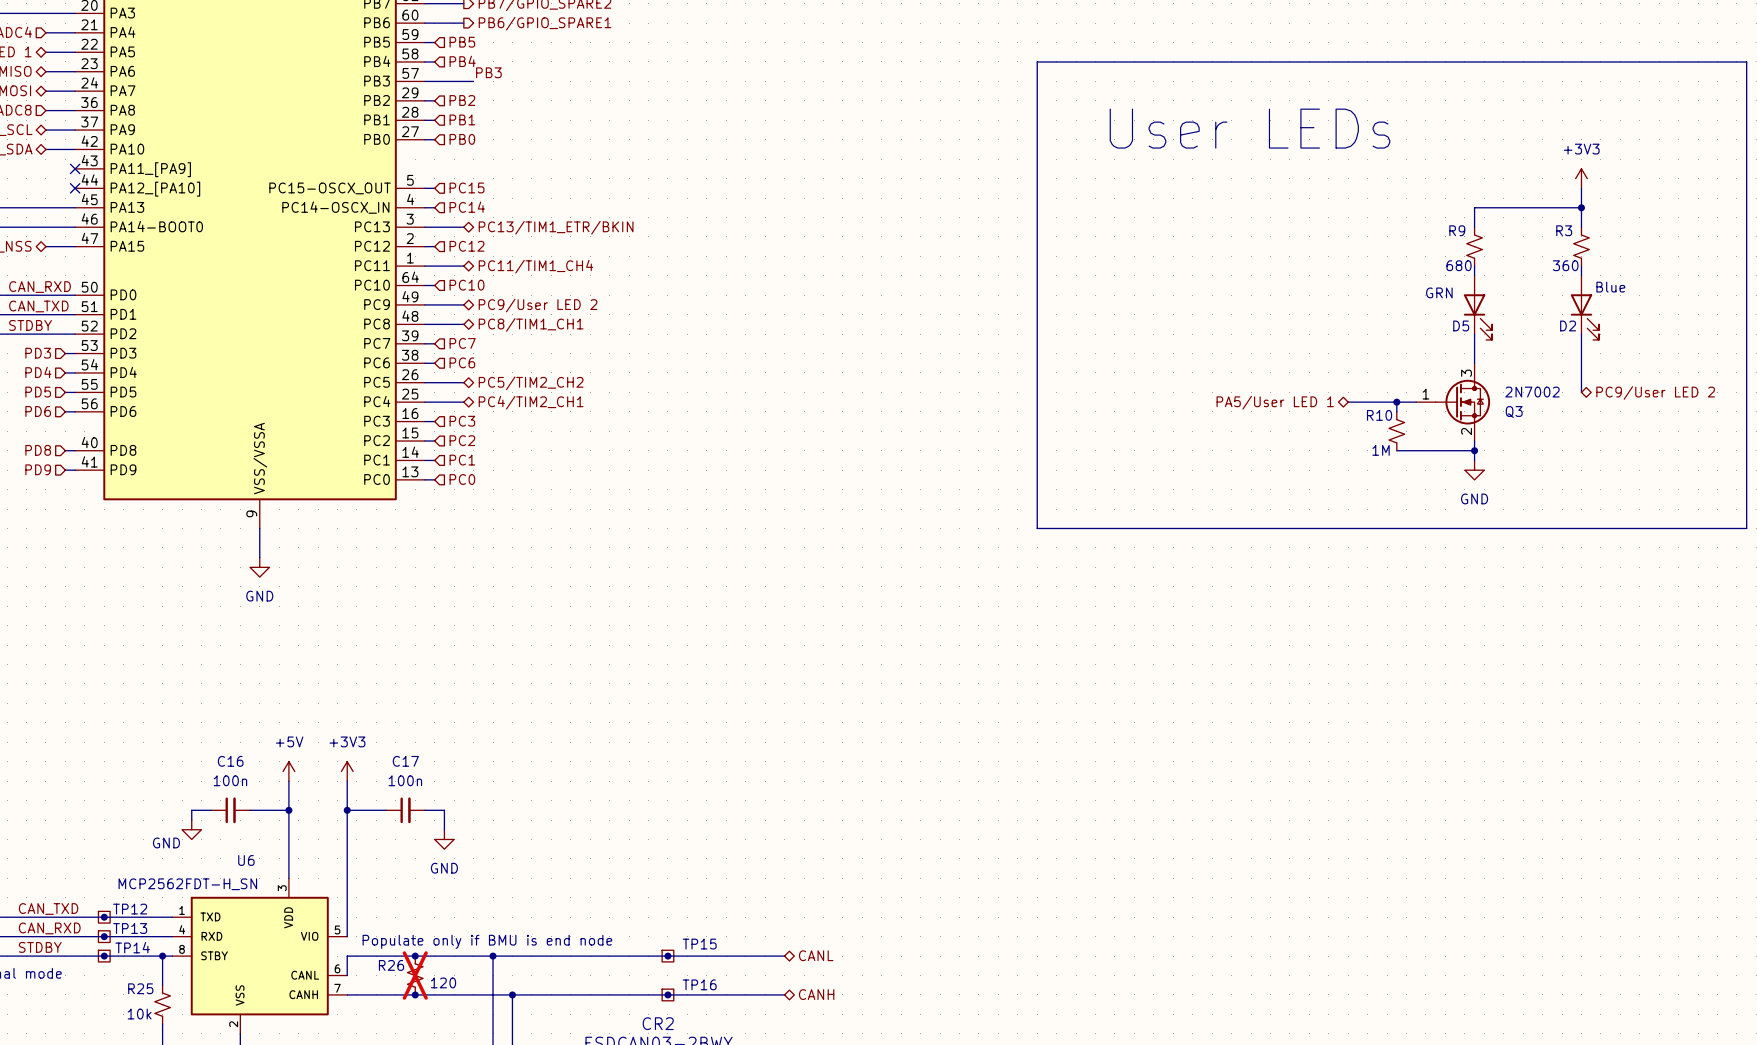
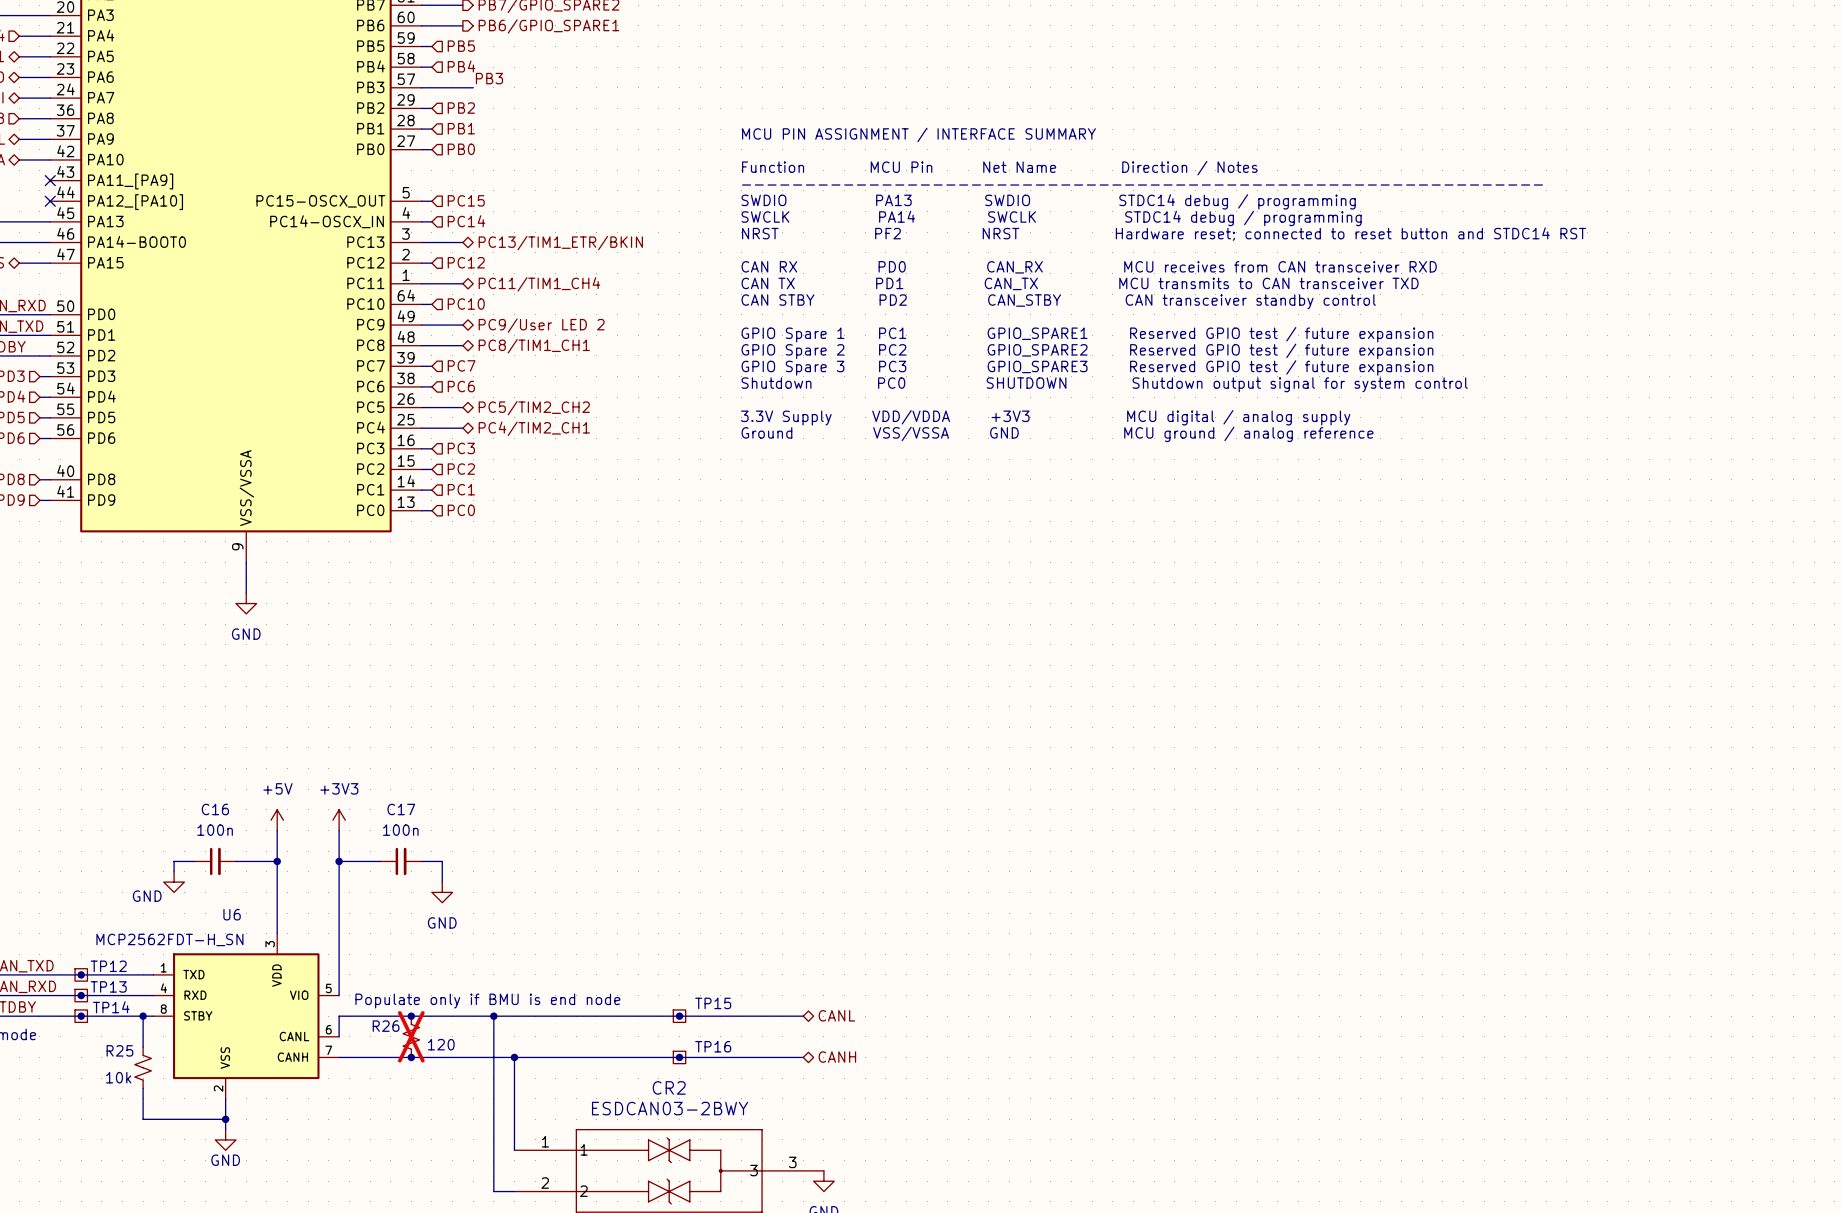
line: (1037, 61) (1746, 61) (1746, 528) (1037, 528) (1037, 61) -> none
text: none -> MCU PIN ASSIGNMENT / INTERFACE SUMMARY (918, 134)
text: User LEDs (1250, 128) -> none
text: none -> Function MCU Pin Net Name Direction / Notes (999, 168)
text: none -> --------------------------------------------------------------- (1142, 185)
power symbol: +3V3 (1581, 178) -> none
text: none -> SWDIO PA13 SWDIO STDC14 debug / programming (1048, 201)
wire: (1581, 188) (1581, 227) -> none
text: none -> SWCLK PA14 SWCLK STDC14 debug / programming (1051, 218)
wire: (1581, 207) (1474, 207) (1474, 227) -> none
junction: (1581, 207) -> none
text: none -> NRST PF2 NRST Hardware reset; connected to reset button and STDC14 RST (1164, 234)
R9: 680 (1474, 246) -> none
R3: 360 (1581, 246) -> none
text: none -> CAN RX PD0 CAN_RX MCU receives from CAN transceiver RXD (1089, 267)
text: none -> CAN TX PD1 CAN_TX MCU transmits to CAN transceiver TXD (1080, 283)
wire: (1474, 266) (1474, 275) -> none
wire: (1581, 266) (1581, 275) -> none
text: none -> CAN STBY PD2 CAN_STBY CAN transceiver standby control (1058, 301)
D5: GRN (1477, 307) -> none
D2: Blue (1584, 307) -> none
text: none -> GPIO Spare 1 PC1 GPIO_SPARE1 Reserved GPIO test / future expansion (1087, 334)
text: none -> GPIO Spare 2 PC2 GPIO_SPARE2 Reserved GPIO test / future expansion (1087, 351)
wire: (1474, 334) (1474, 363) -> none
wire: (1581, 334) (1581, 392) -> none
text: none -> GPIO Spare 3 PC3 GPIO_SPARE3 Reserved GPIO test / future expansion (1087, 367)
text: none -> Shutdown PC0 SHUTDOWN Shutdown output signal for system control (1104, 384)
text: none -> 3.3V Supply VDD/VDDA +3V3 MCU digital / analog supply (1045, 417)
hierarchical label: PC9/User LED 2 (1655, 392) -> none
hierarchical label: PA5/User LED 1 (1275, 402) -> none
wire: (1348, 402) (1416, 402) -> none
wire: (1396, 402) (1396, 411) -> none
junction: (1396, 402) -> none
Q3: 2N7002 (1453, 402) -> none
text: none -> Ground VSS/VSSA GND MCU ground / analog reference (1057, 434)
R10: 1M (1396, 431) -> none
wire: (1474, 441) (1474, 460) -> none
wire: (1396, 450) (1474, 450) -> none
junction: (1474, 450) -> none
power symbol: GND (1474, 470) -> none

